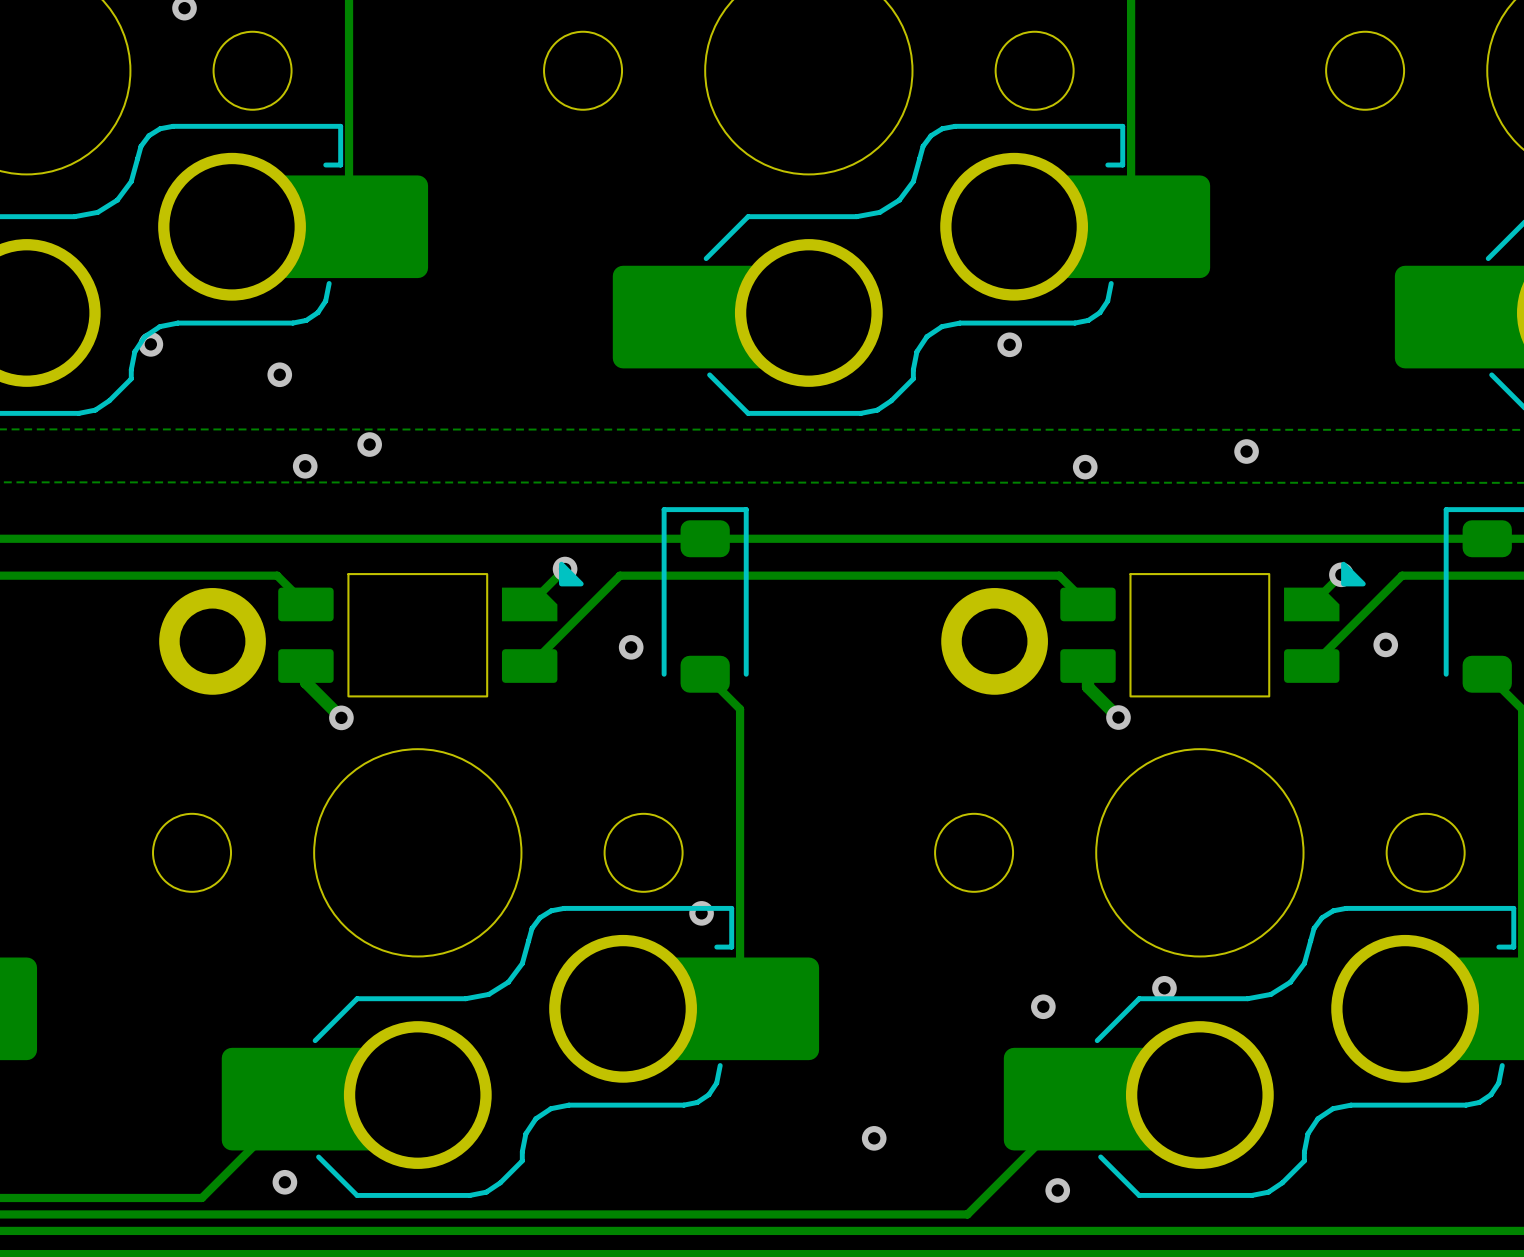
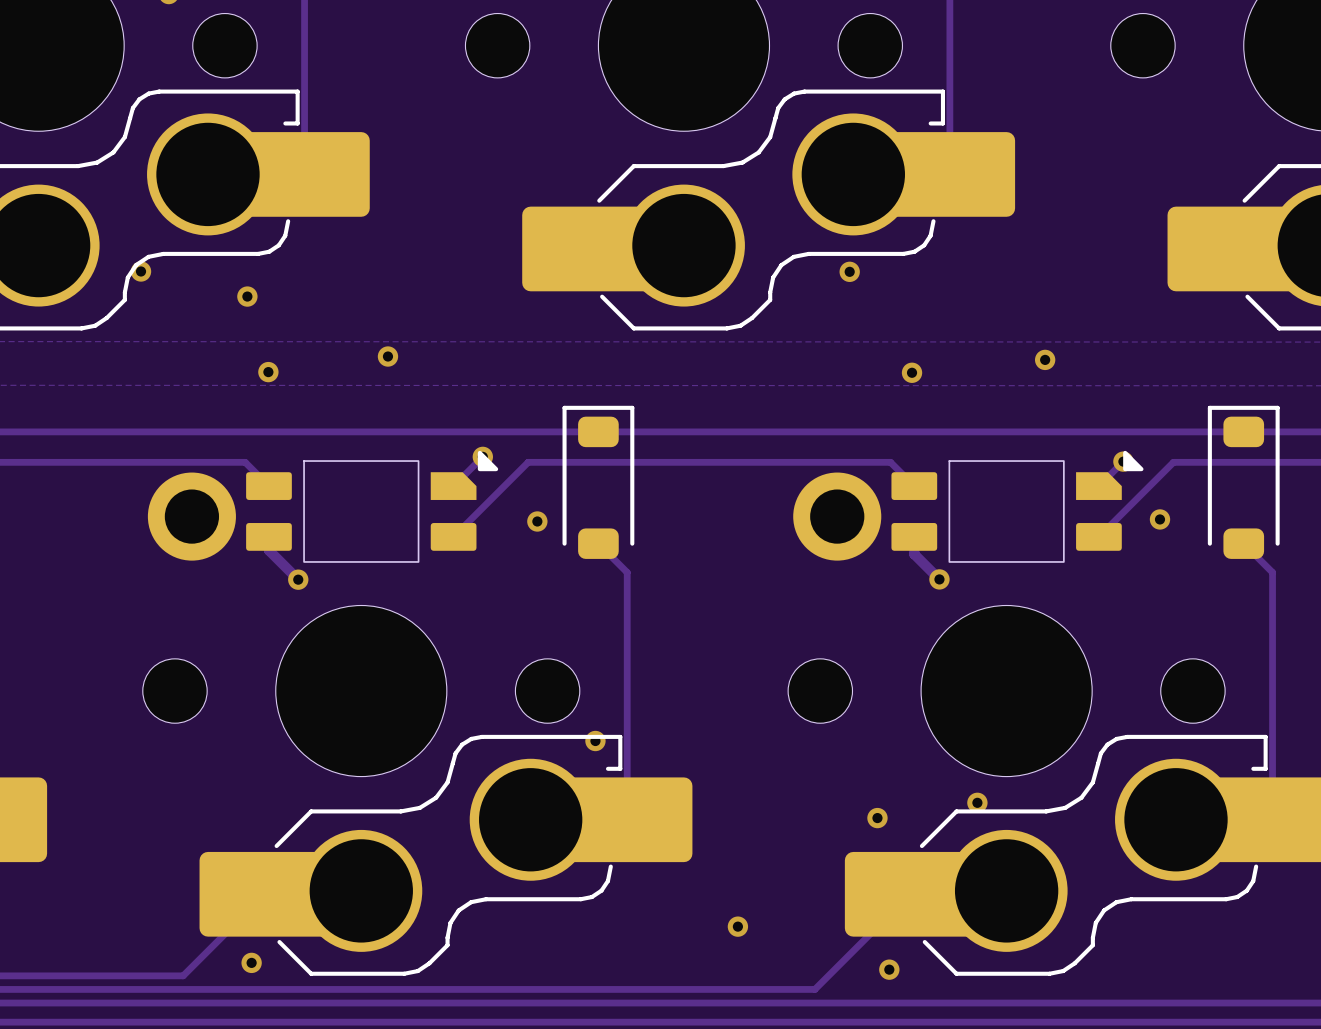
via position: (369, 444) -> (387, 356)

